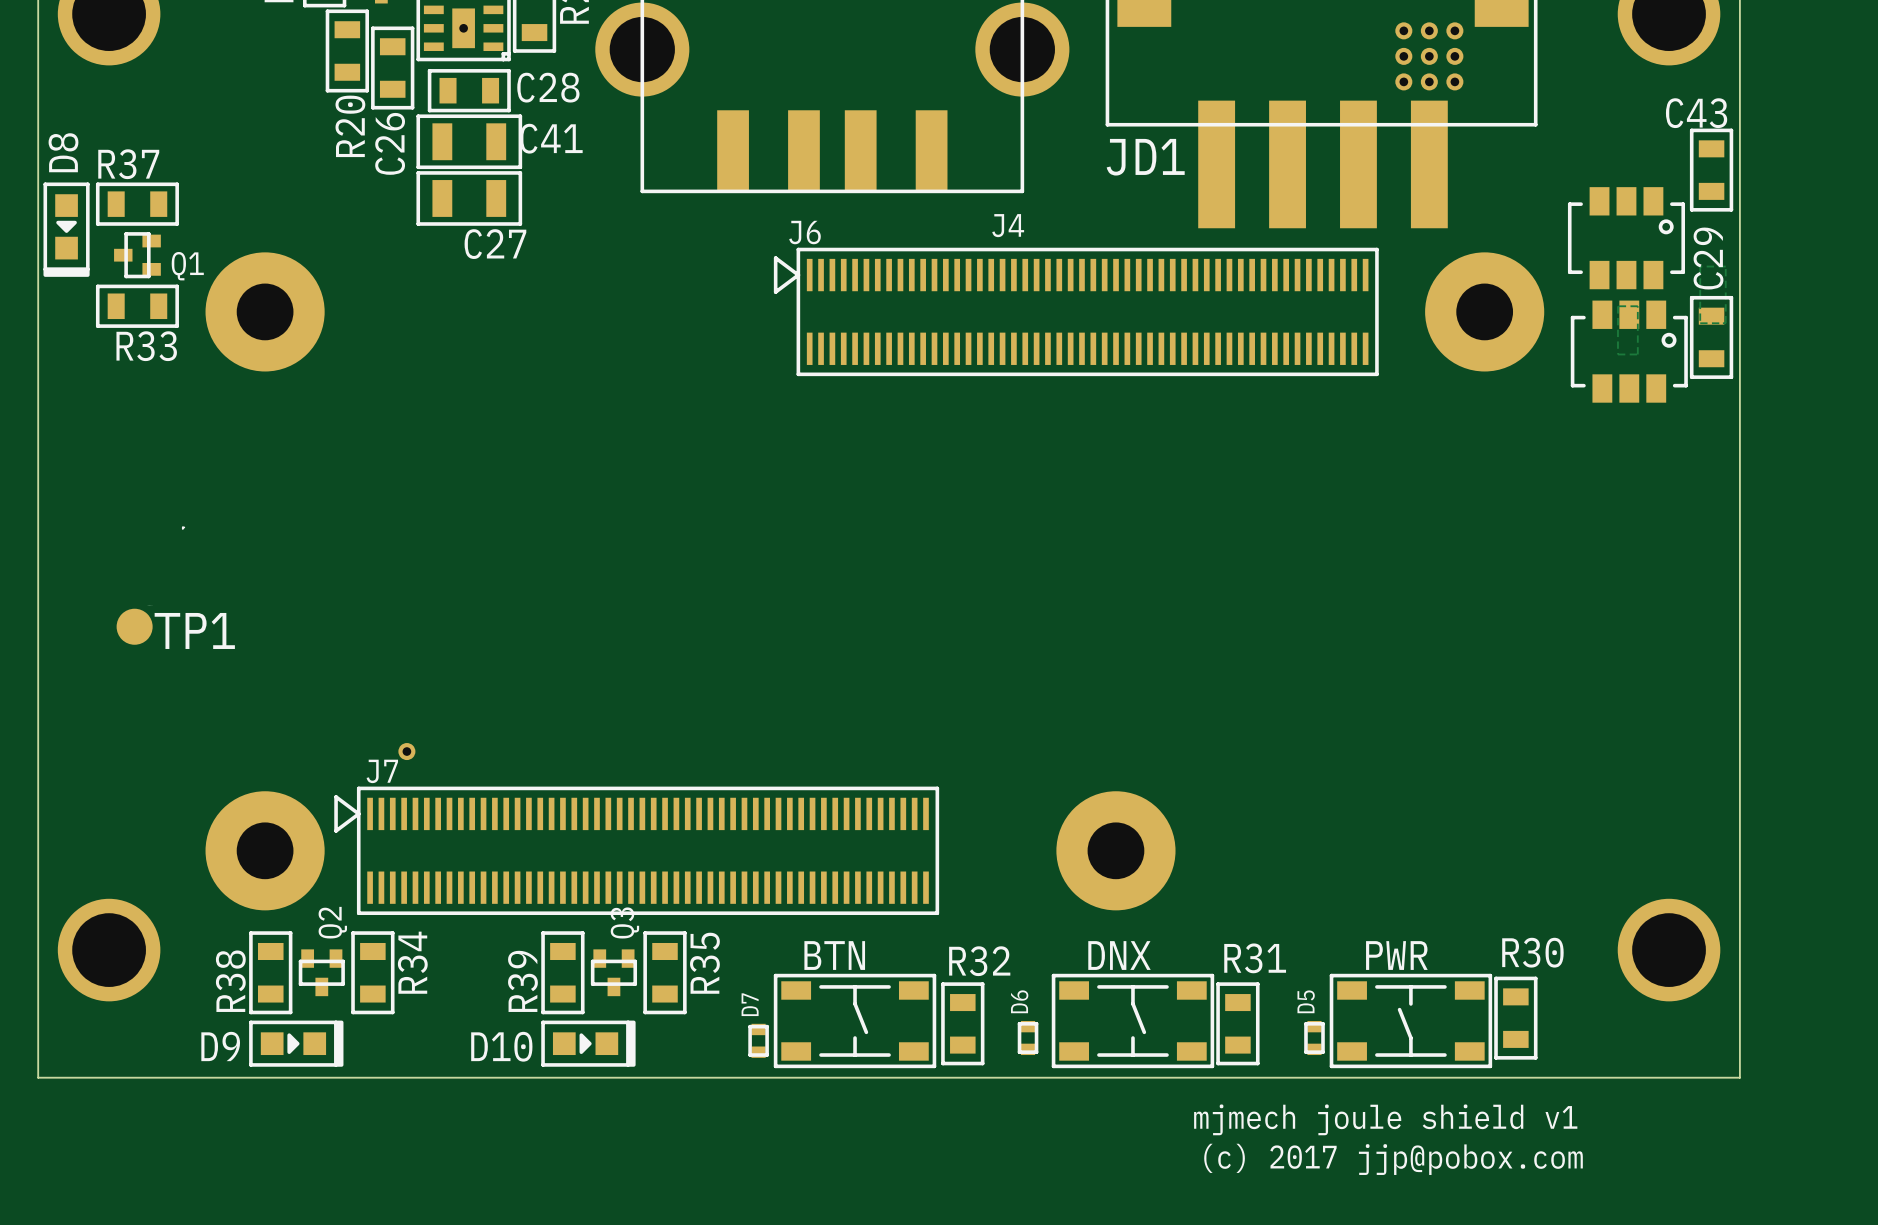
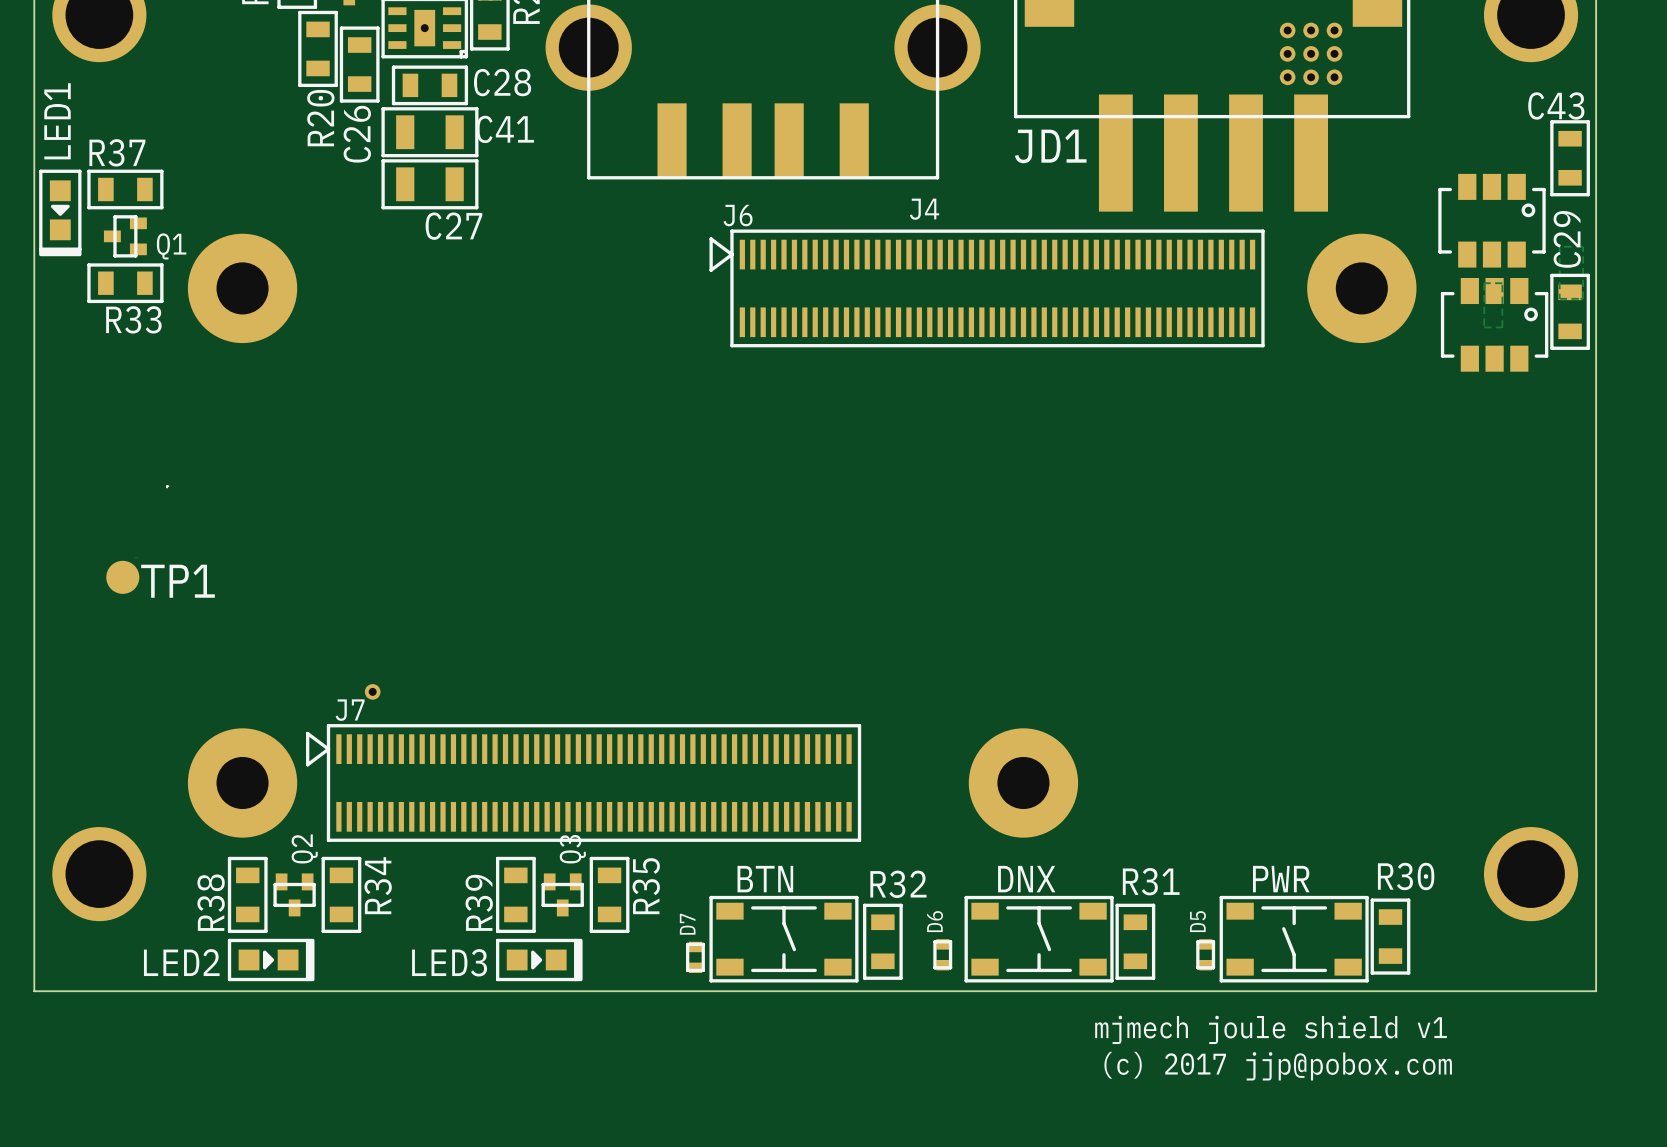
D8 name: D8 (63, 152) -> LED1 (57, 121)
D9 name: D9 (220, 1046) -> LED2 (181, 962)
D10 name: D10 (501, 1046) -> LED3 (449, 962)

